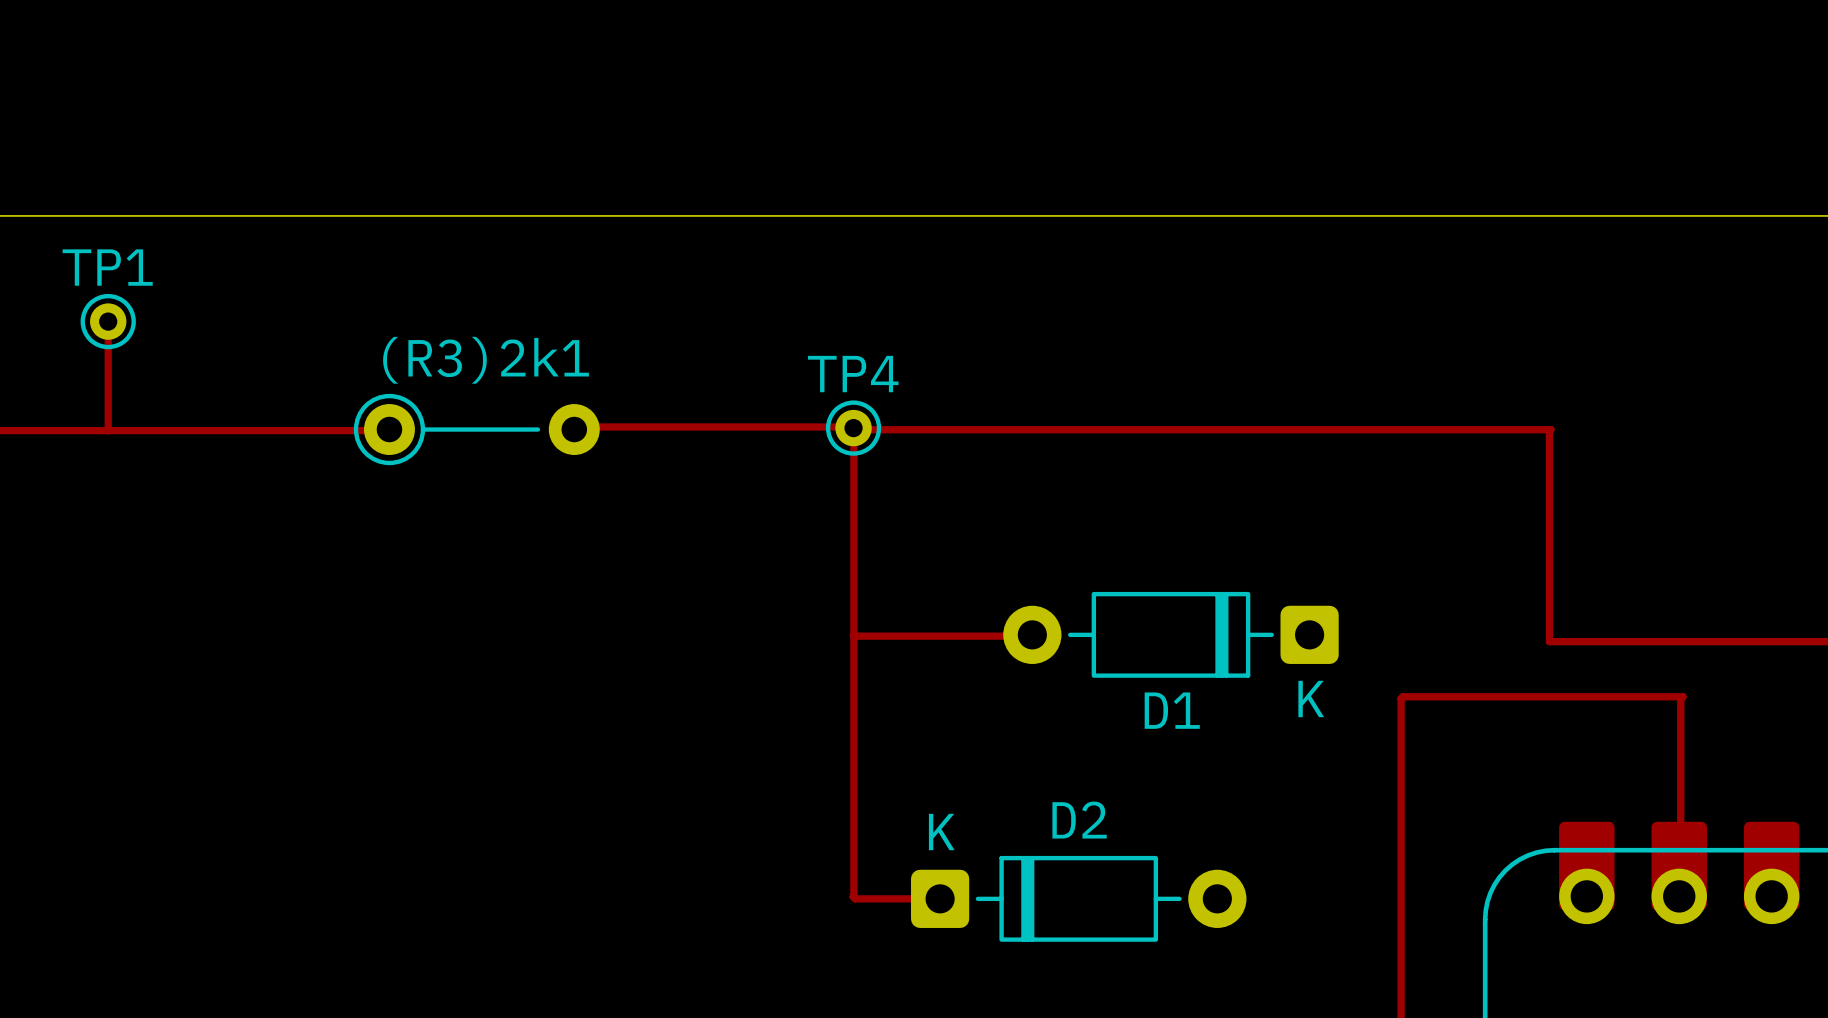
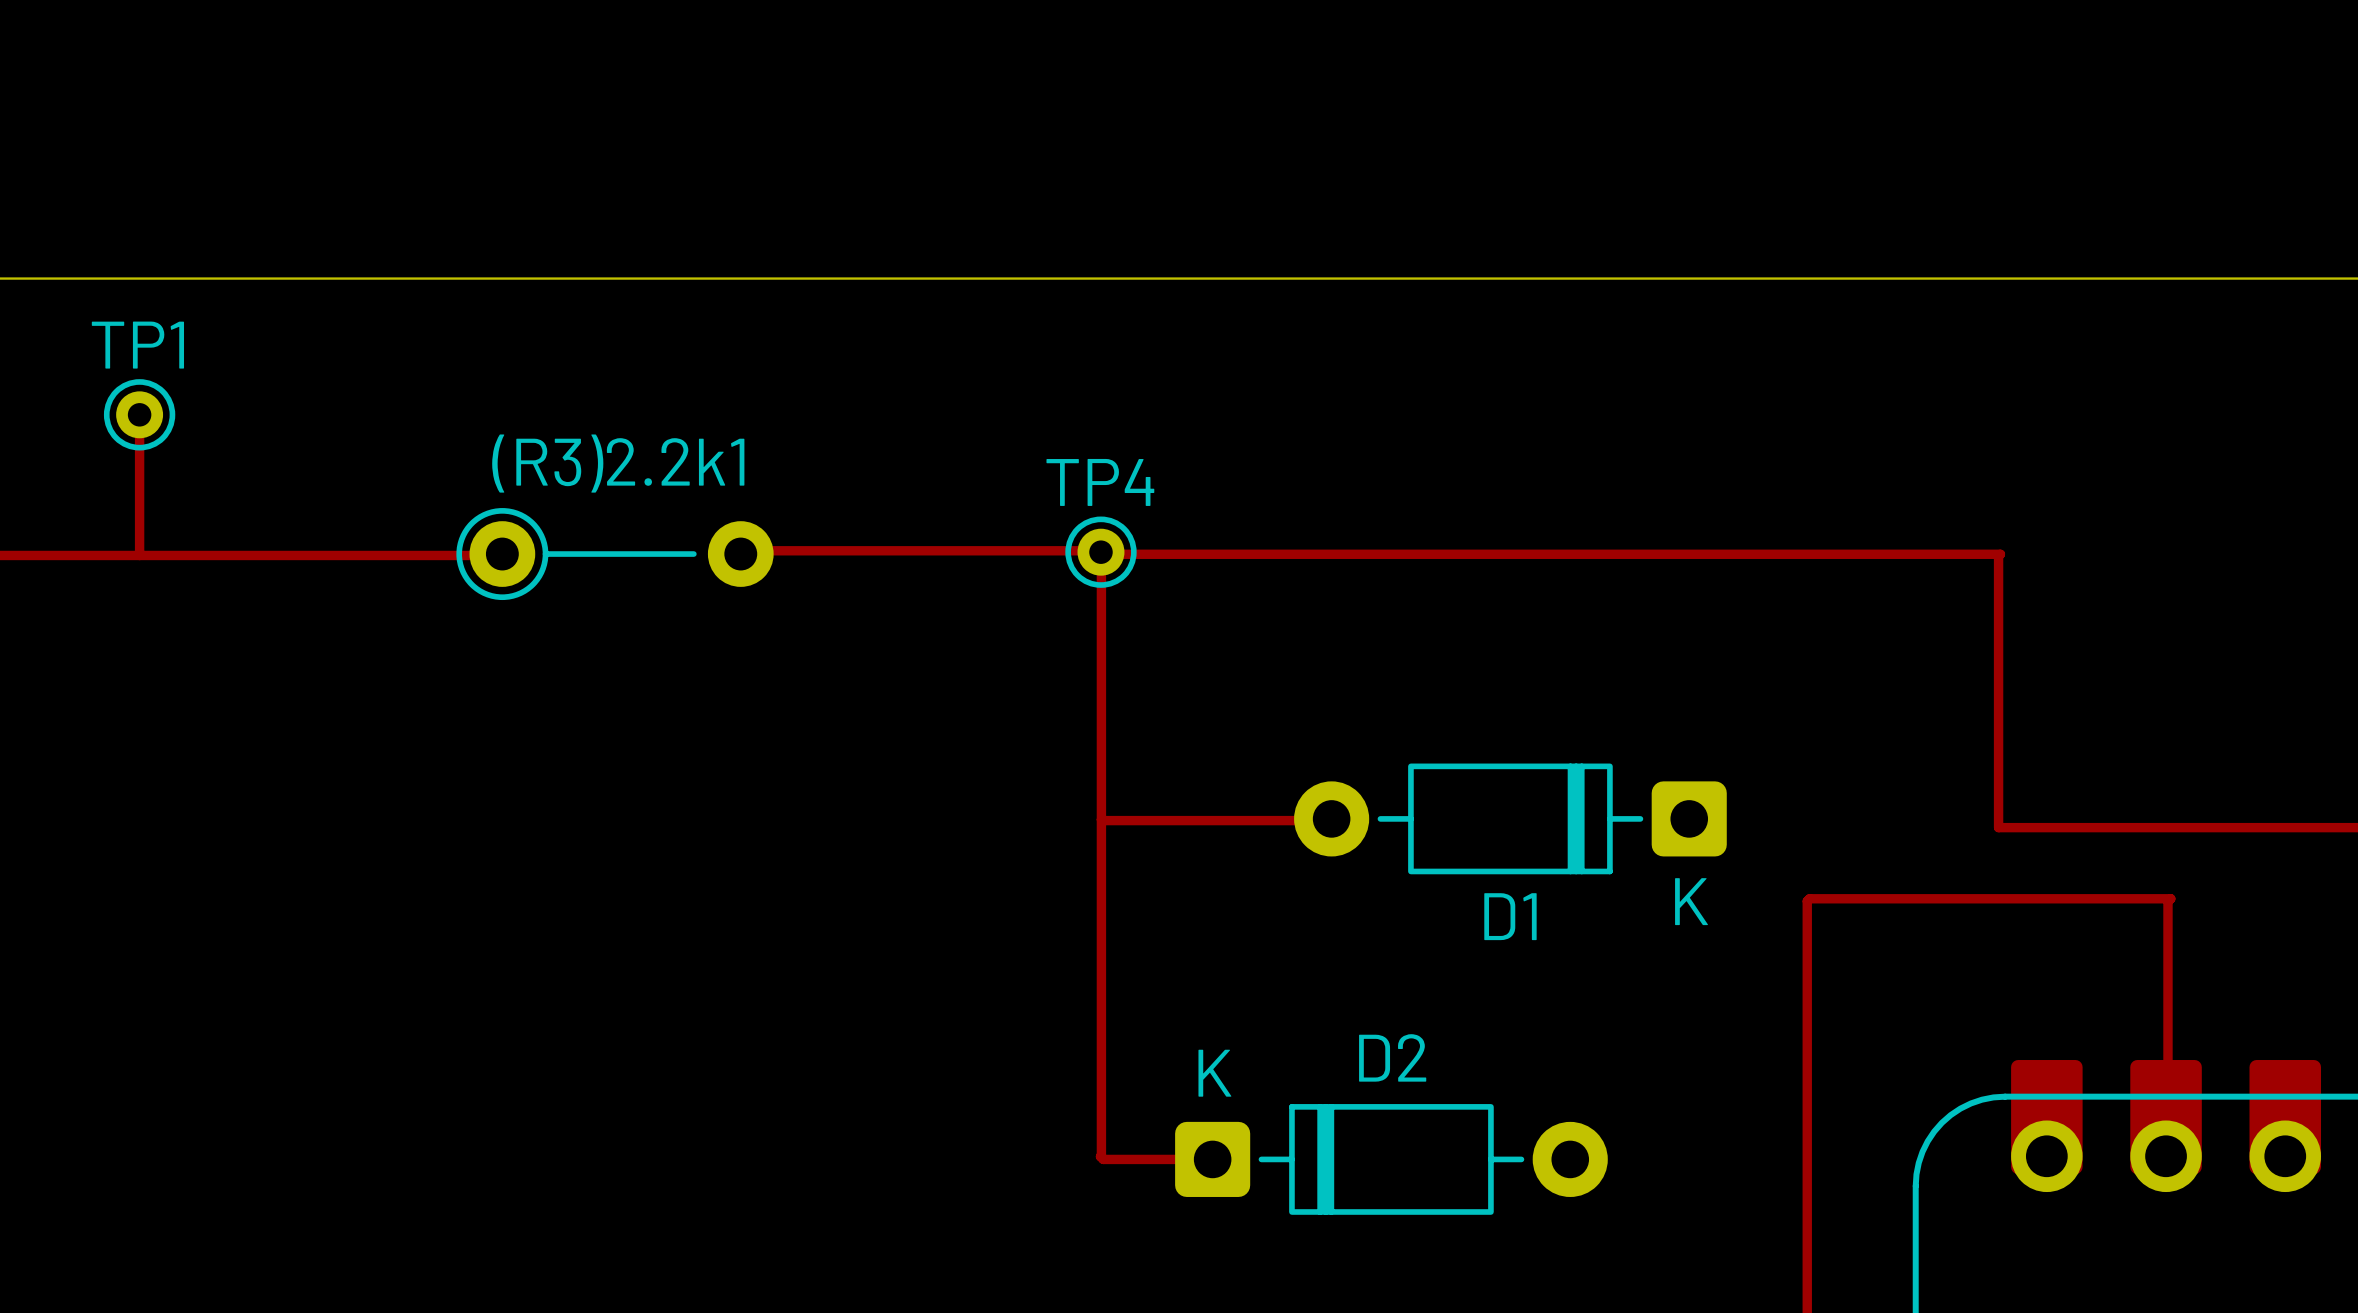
(R3)2k1 name: (R3)2k1 (486, 360) -> (R3)2.2k1 (618, 463)

